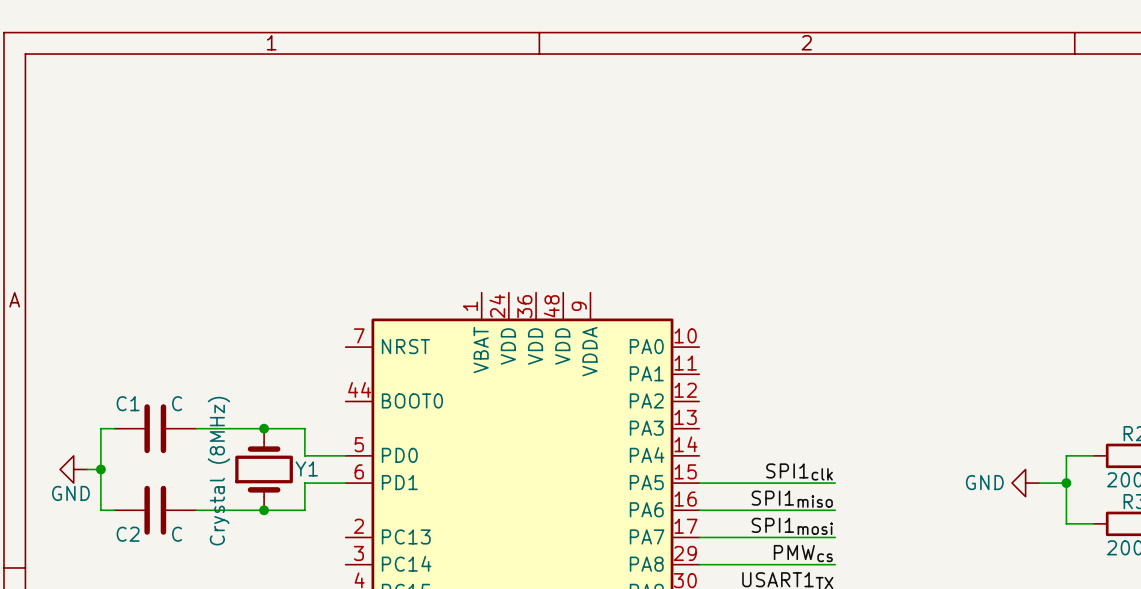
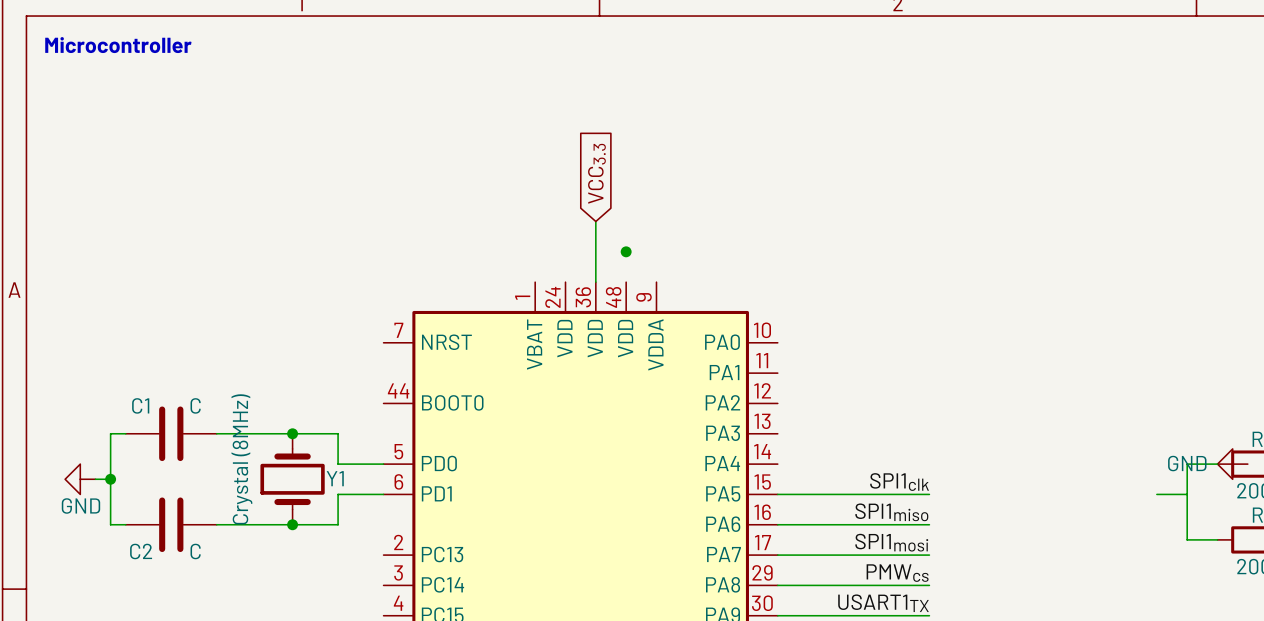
text: none -> Microcontroller (118, 45)
global label: none -> VCC3.3 (596, 173)
wire: none -> (595, 221) (595, 282)
junction: none -> (626, 251)
power symbol position: GND (1025, 483) -> GND (1232, 464)
junction: (1066, 483) -> none

